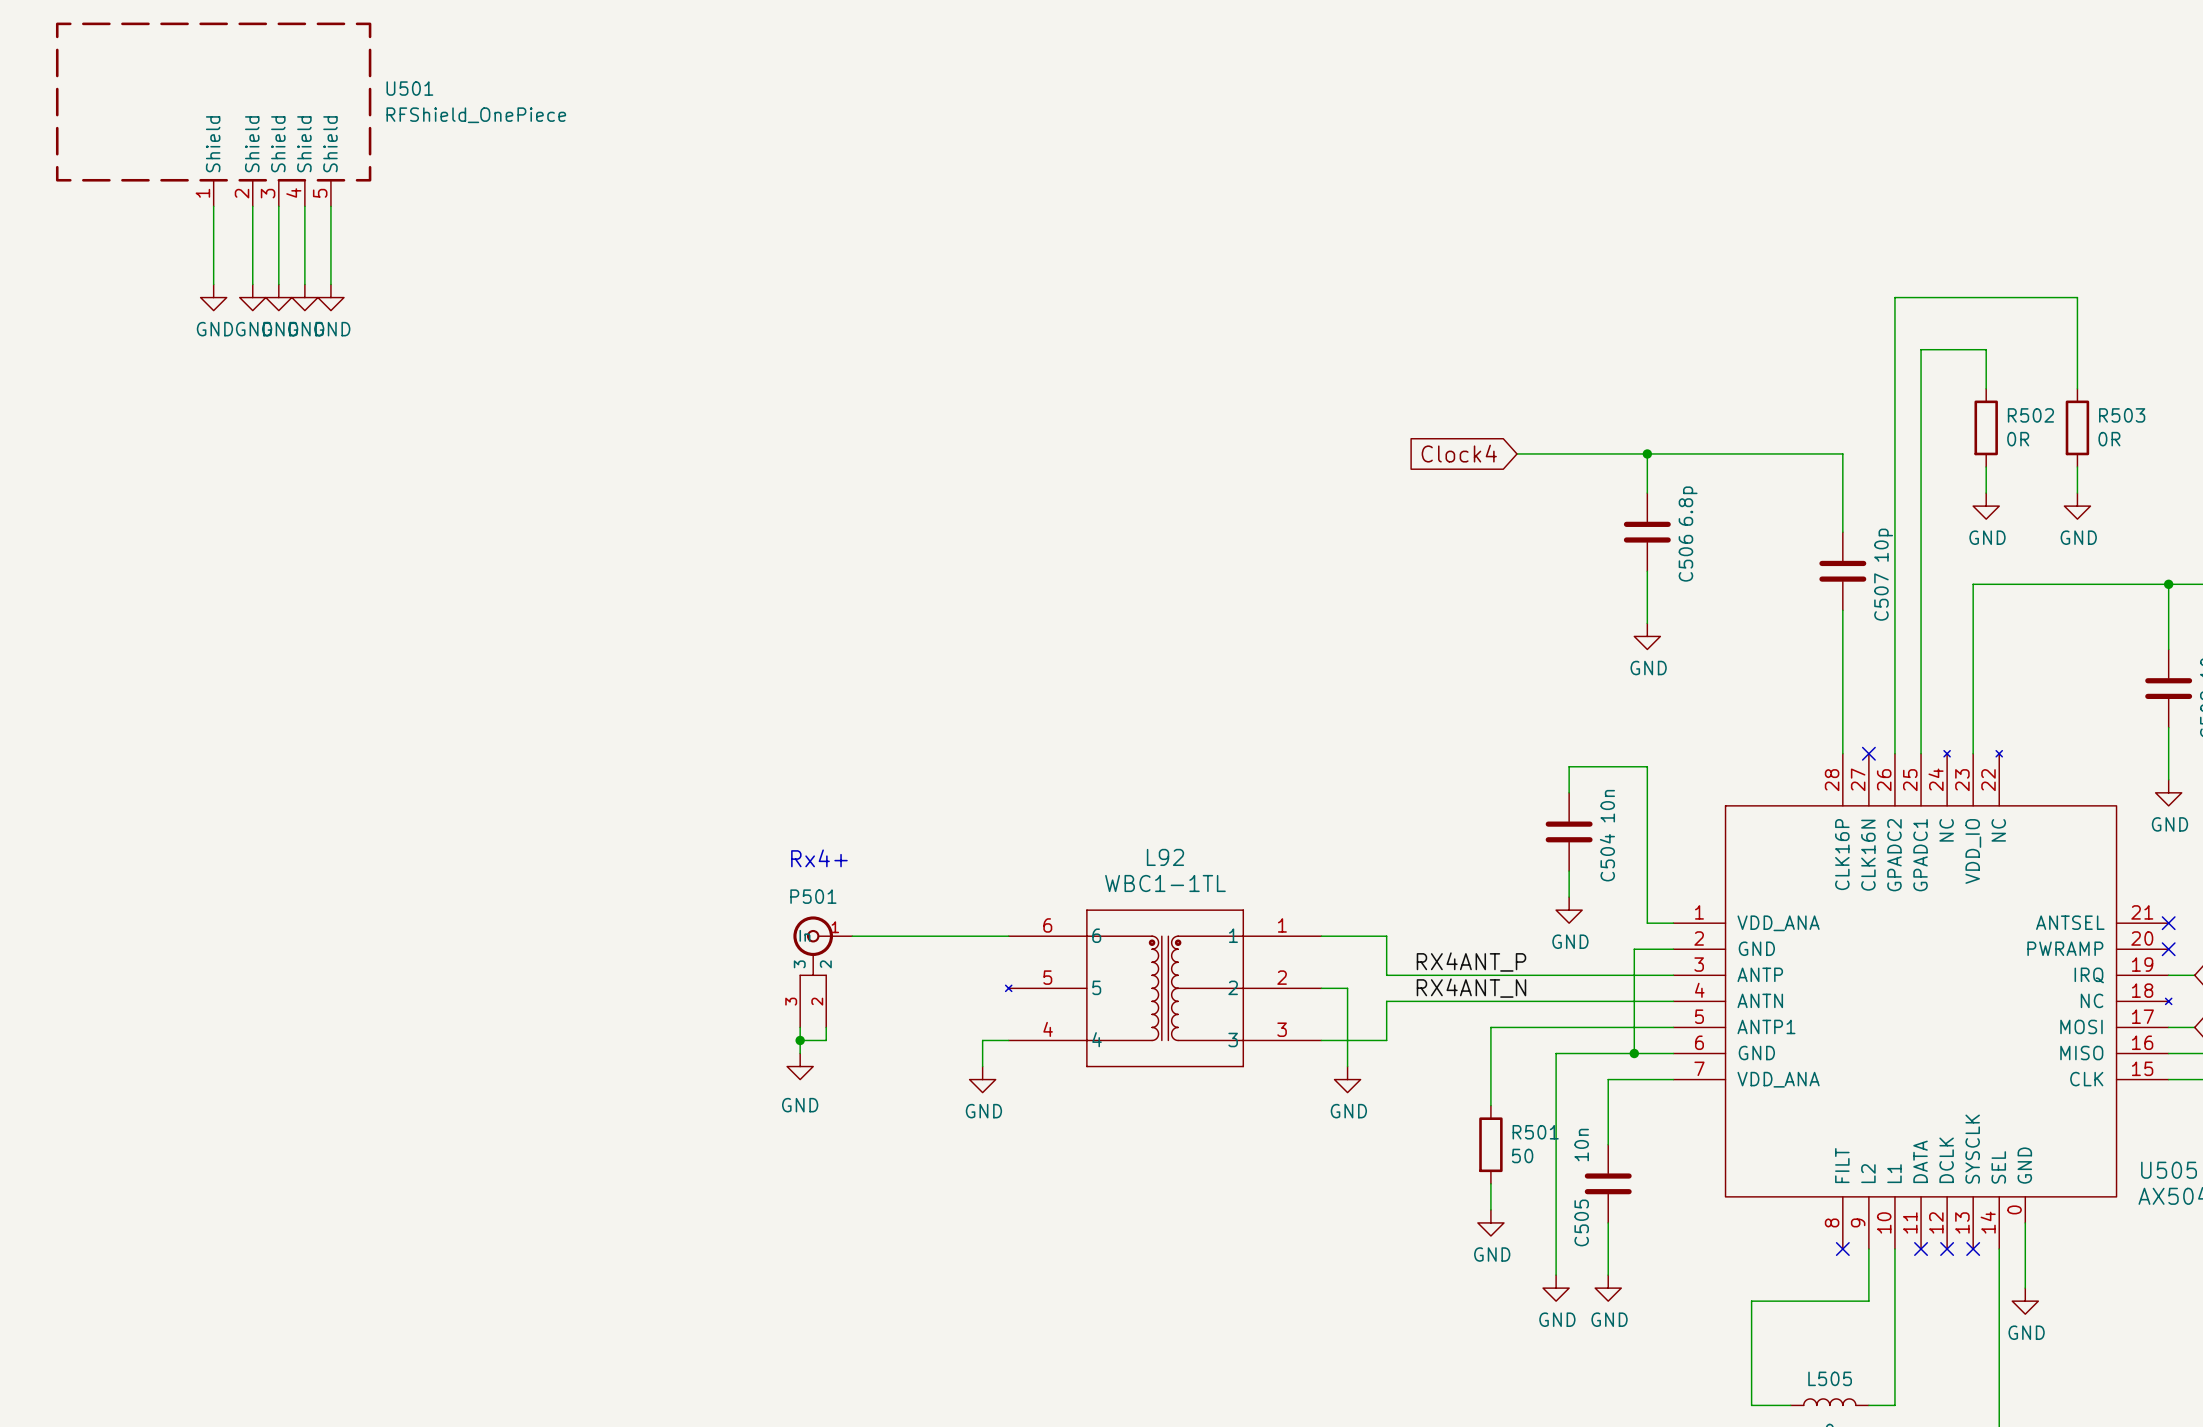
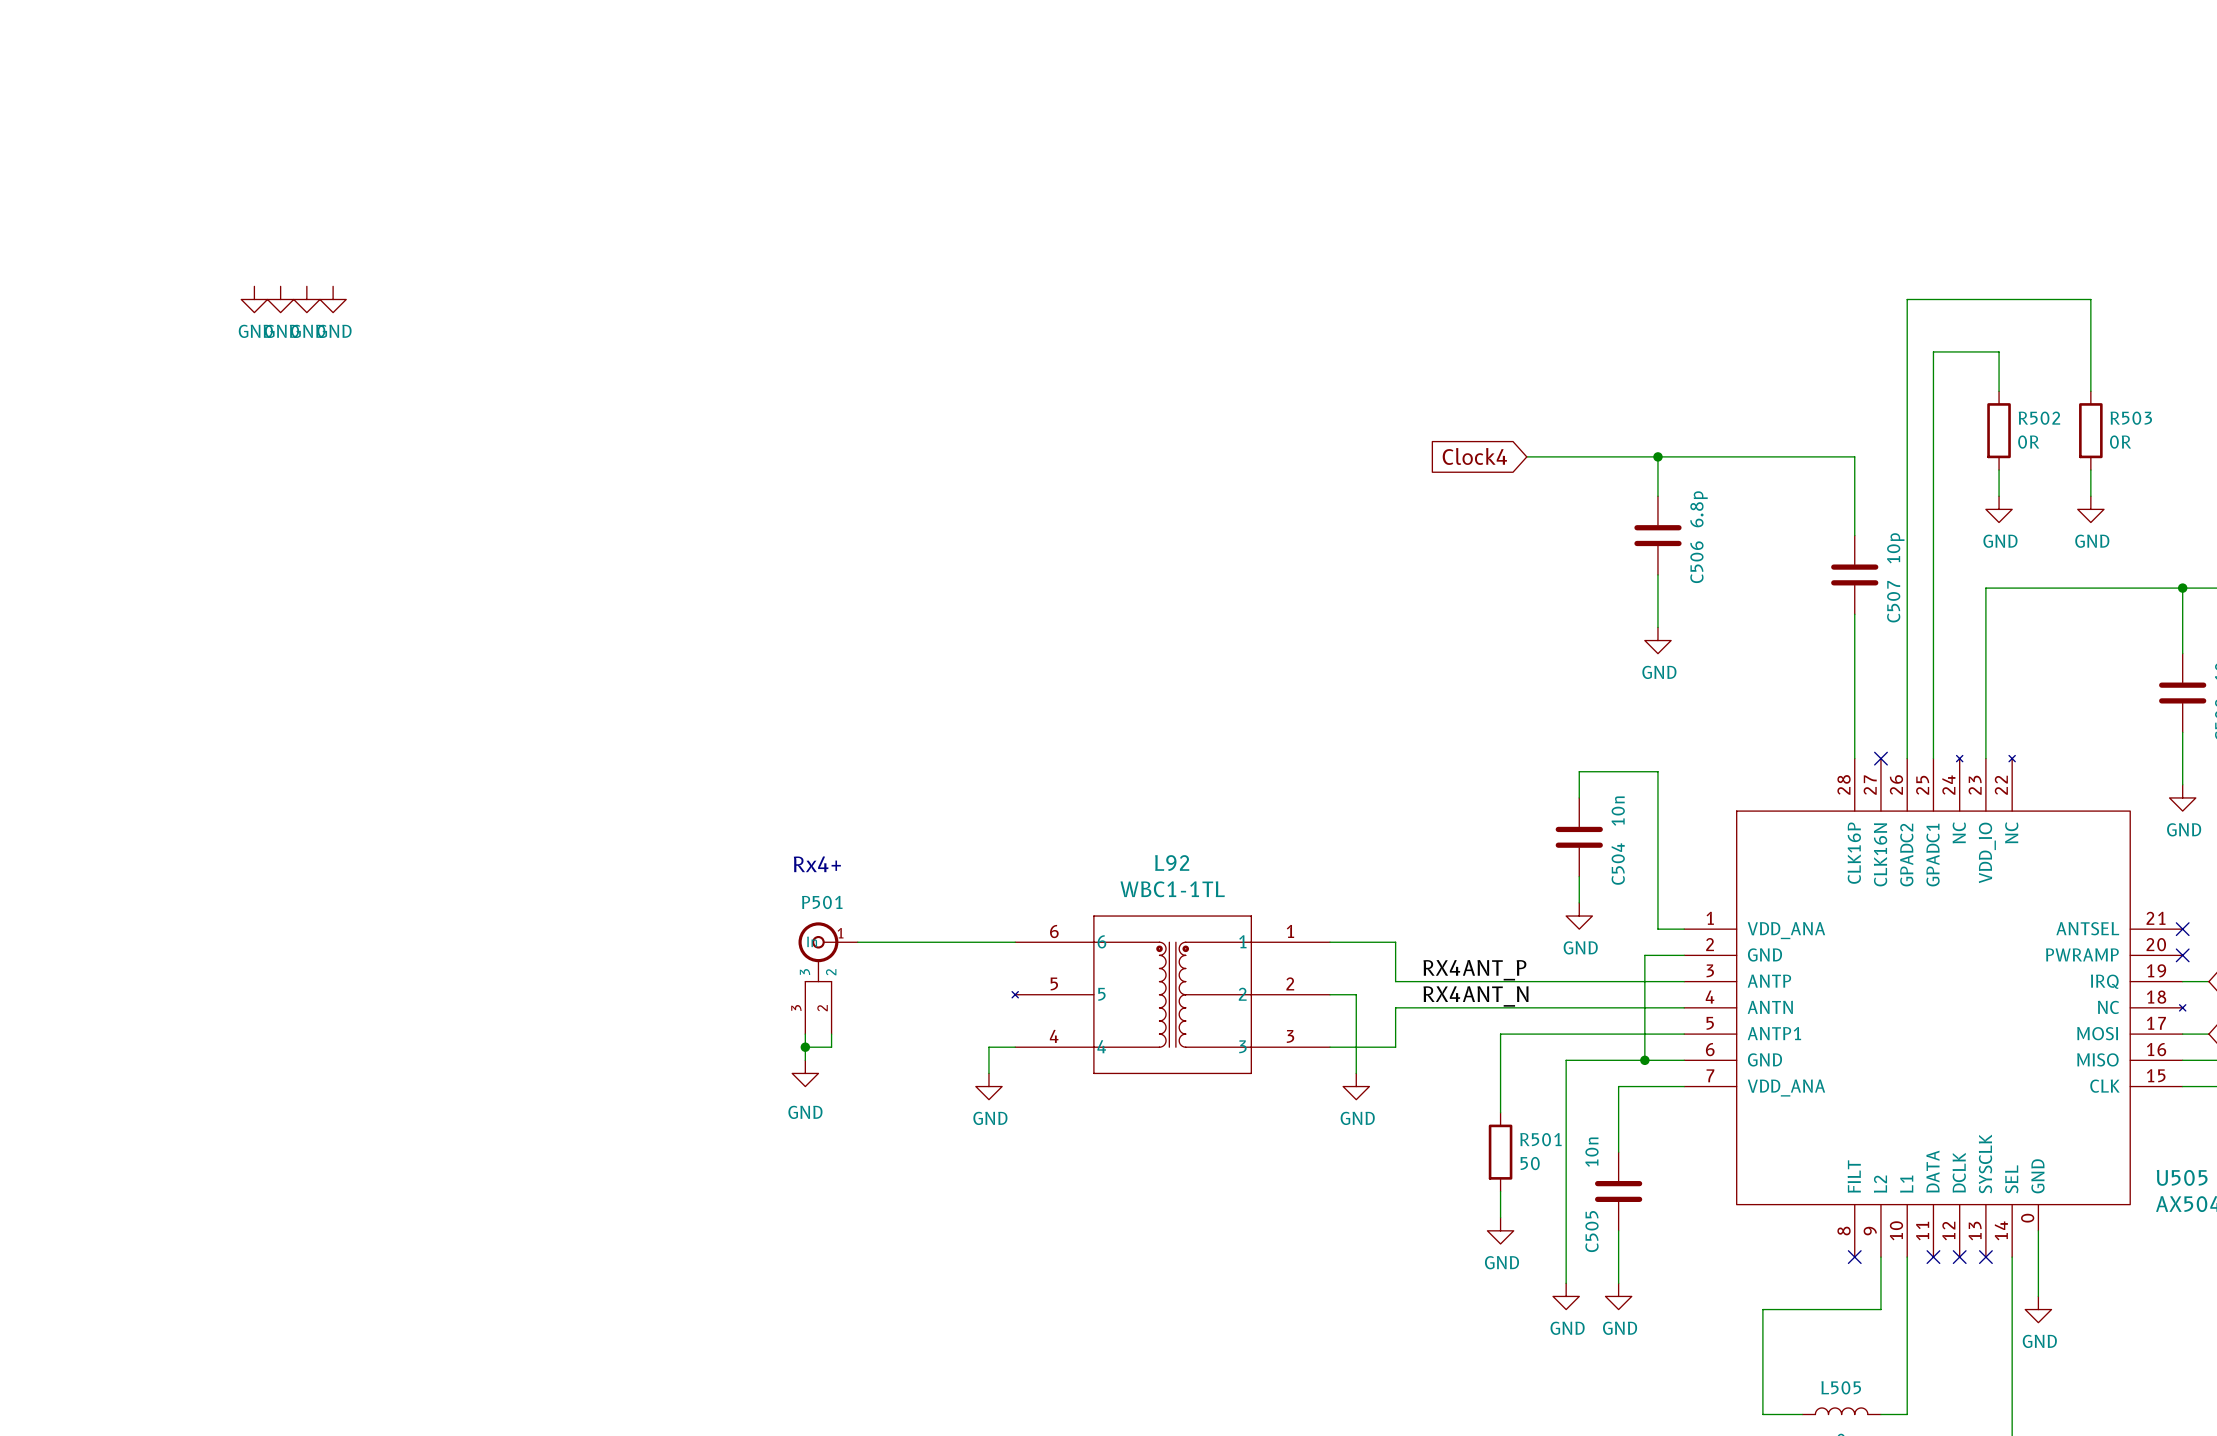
U501: RFShield_OnePiece (213, 114) -> none
wire: (213, 206) (213, 284) -> none
wire: (252, 206) (252, 284) -> none
wire: (278, 206) (278, 284) -> none
wire: (304, 206) (304, 284) -> none
wire: (330, 206) (330, 284) -> none
power symbol: GND (213, 297) -> none

